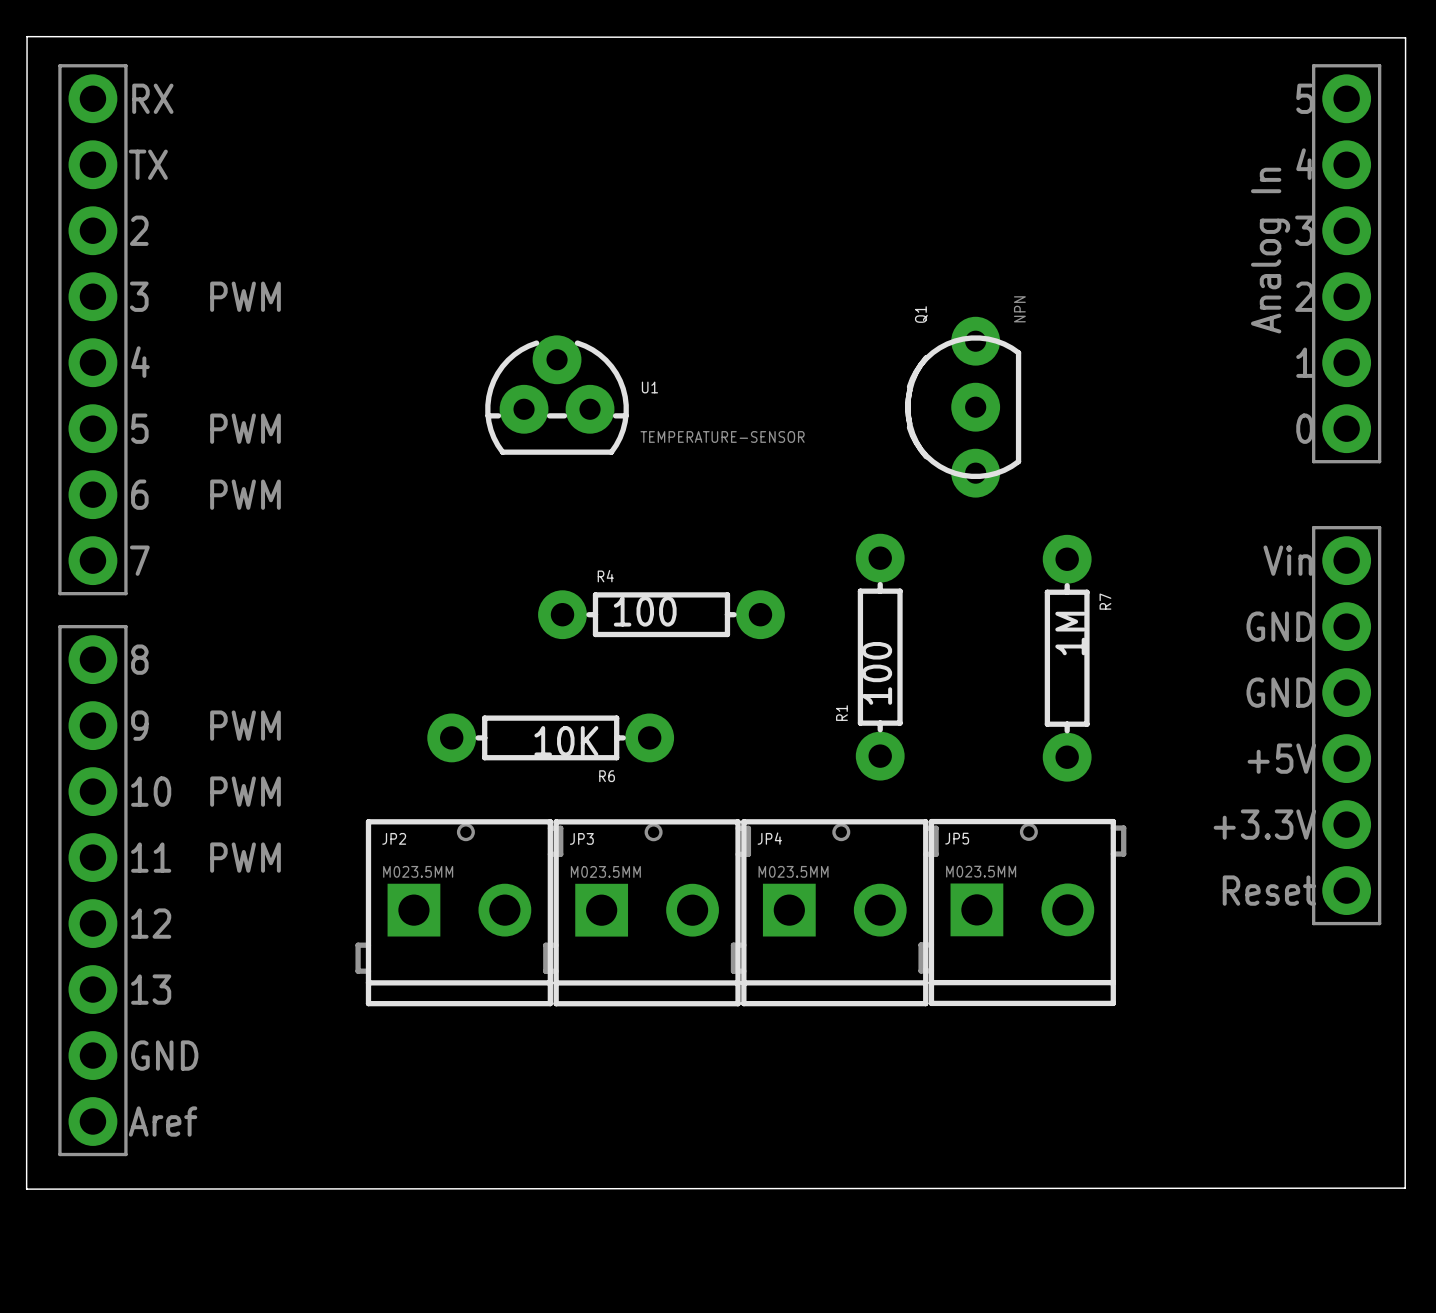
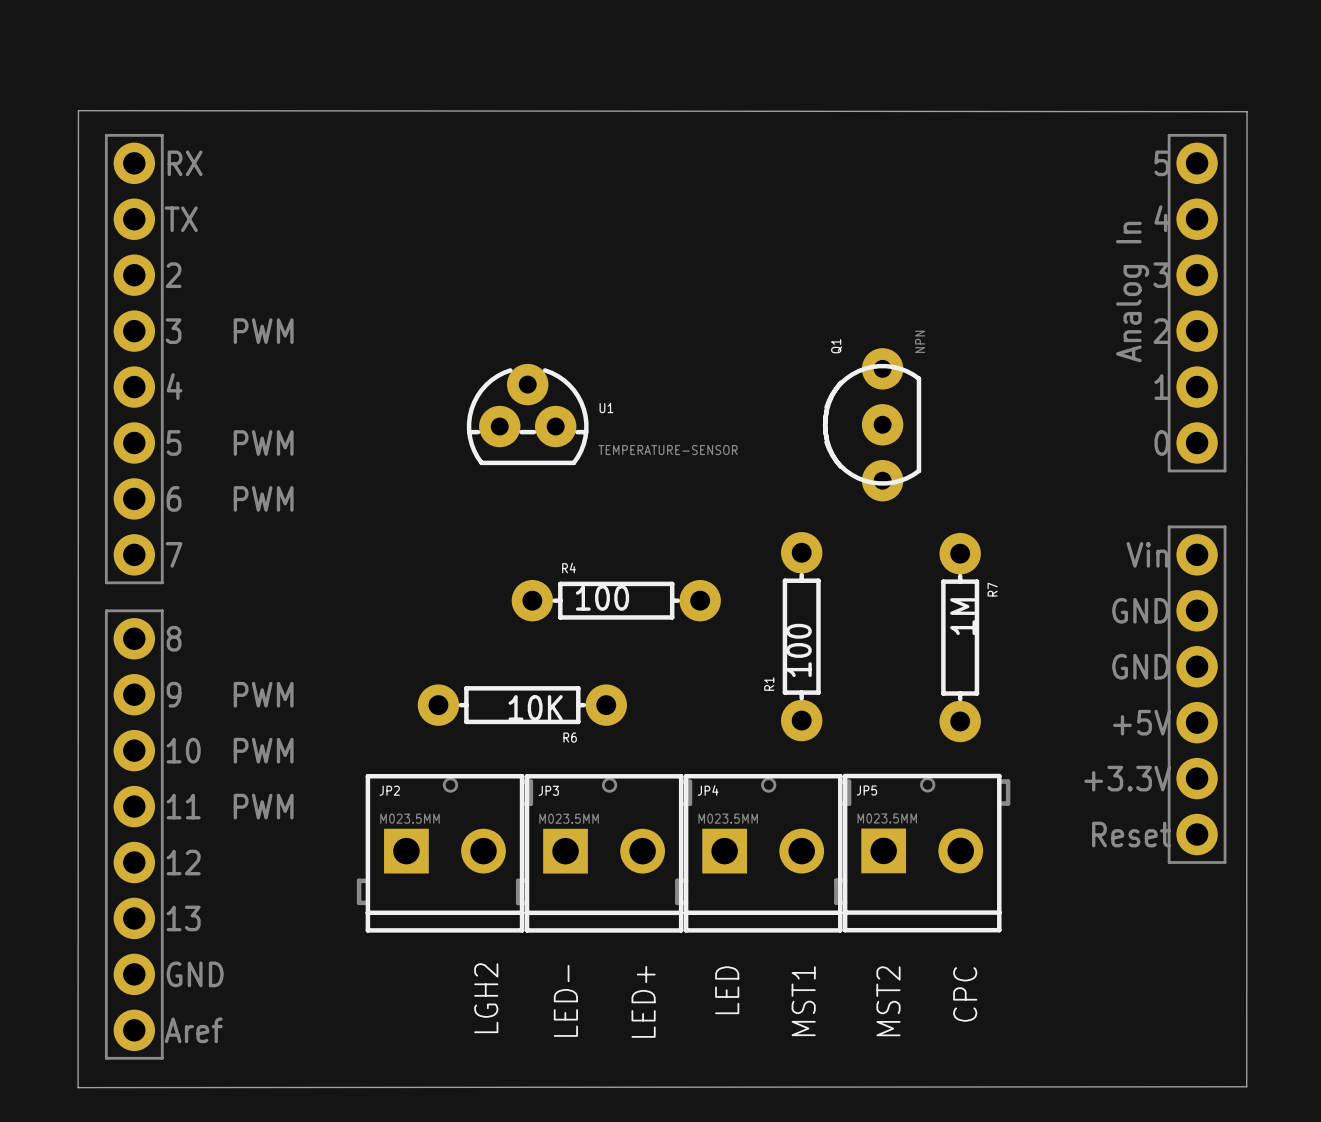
text: none -> LED (727, 990)
text: none -> CPC (965, 994)
text: none -> LGH2 (486, 998)
text: none -> LED- (565, 1000)
text: none -> LED+ (643, 1001)
text: none -> MST1 (803, 1001)
text: none -> MST2 (888, 1001)

